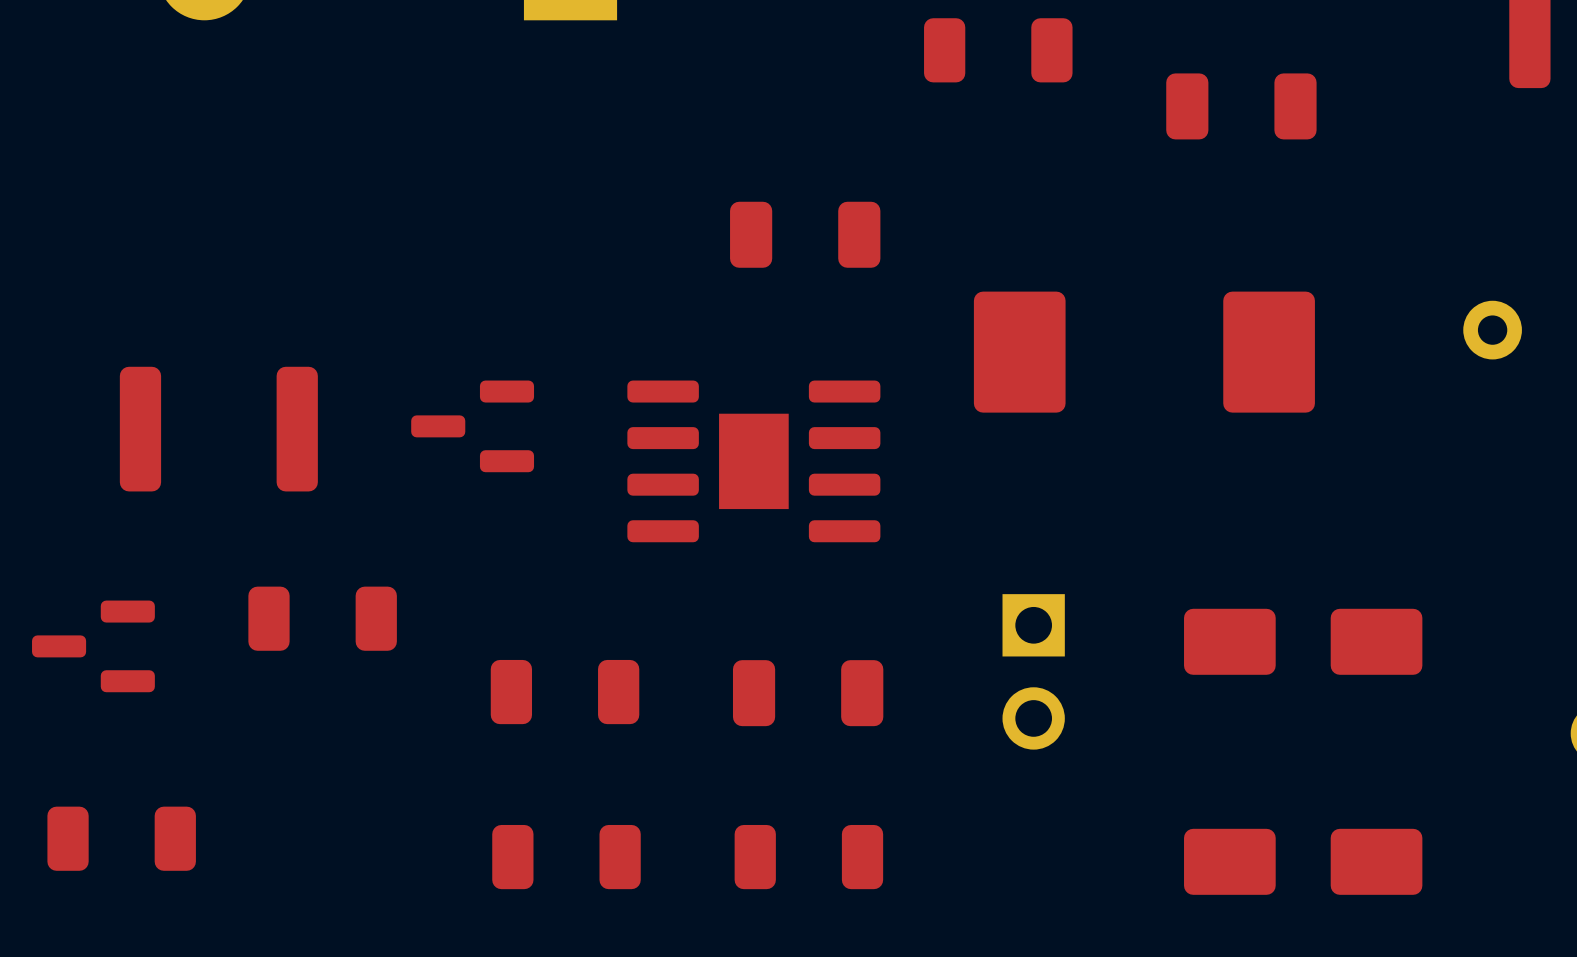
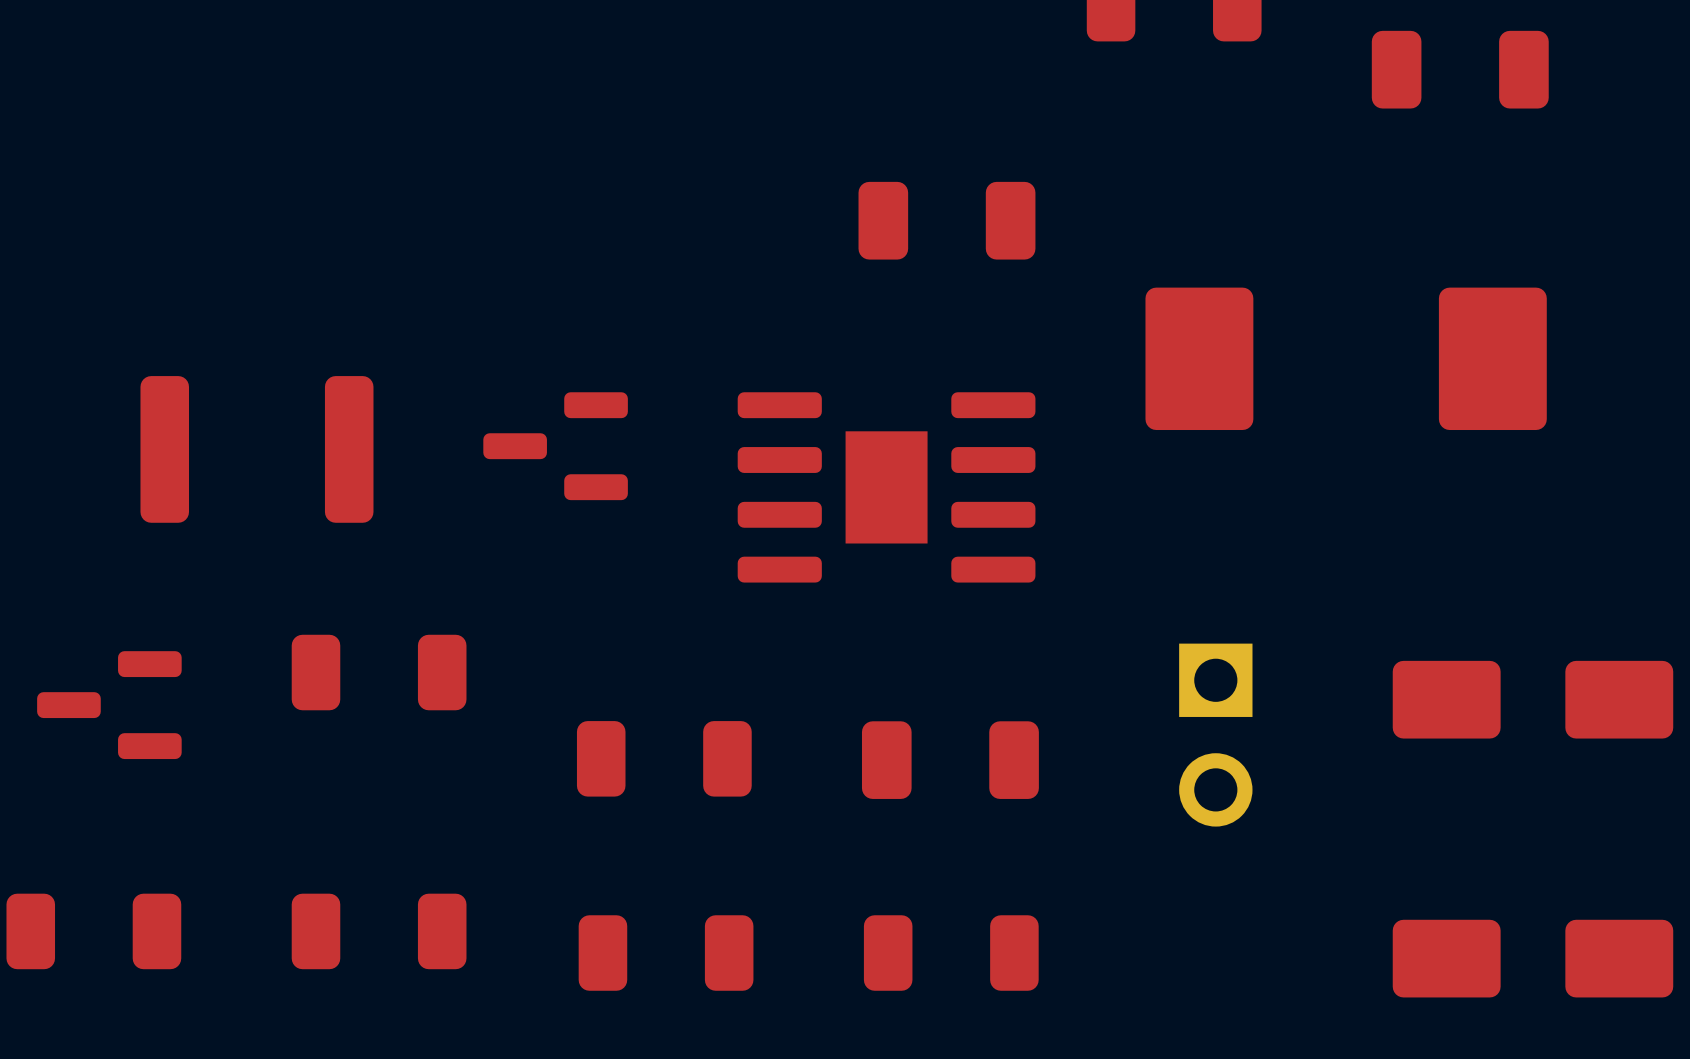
part position: (121, 838) -> (93, 931)
part: none -> (379, 931)

